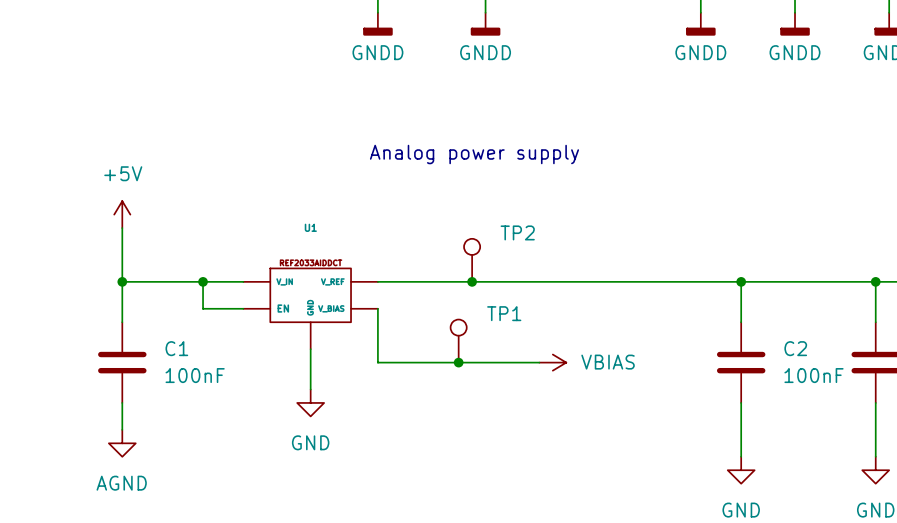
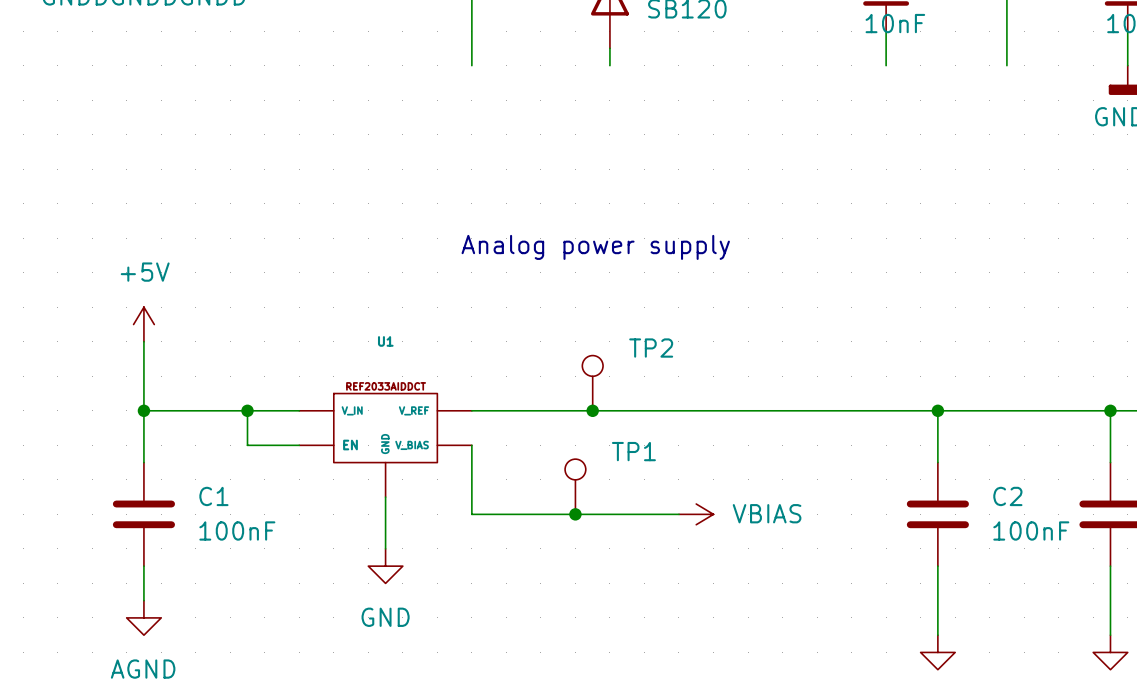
power symbol: GNDD (377, 24) -> none
power symbol: GNDD (485, 24) -> none
power symbol: GNDD (700, 24) -> none
power symbol: GNDD (795, 24) -> none

